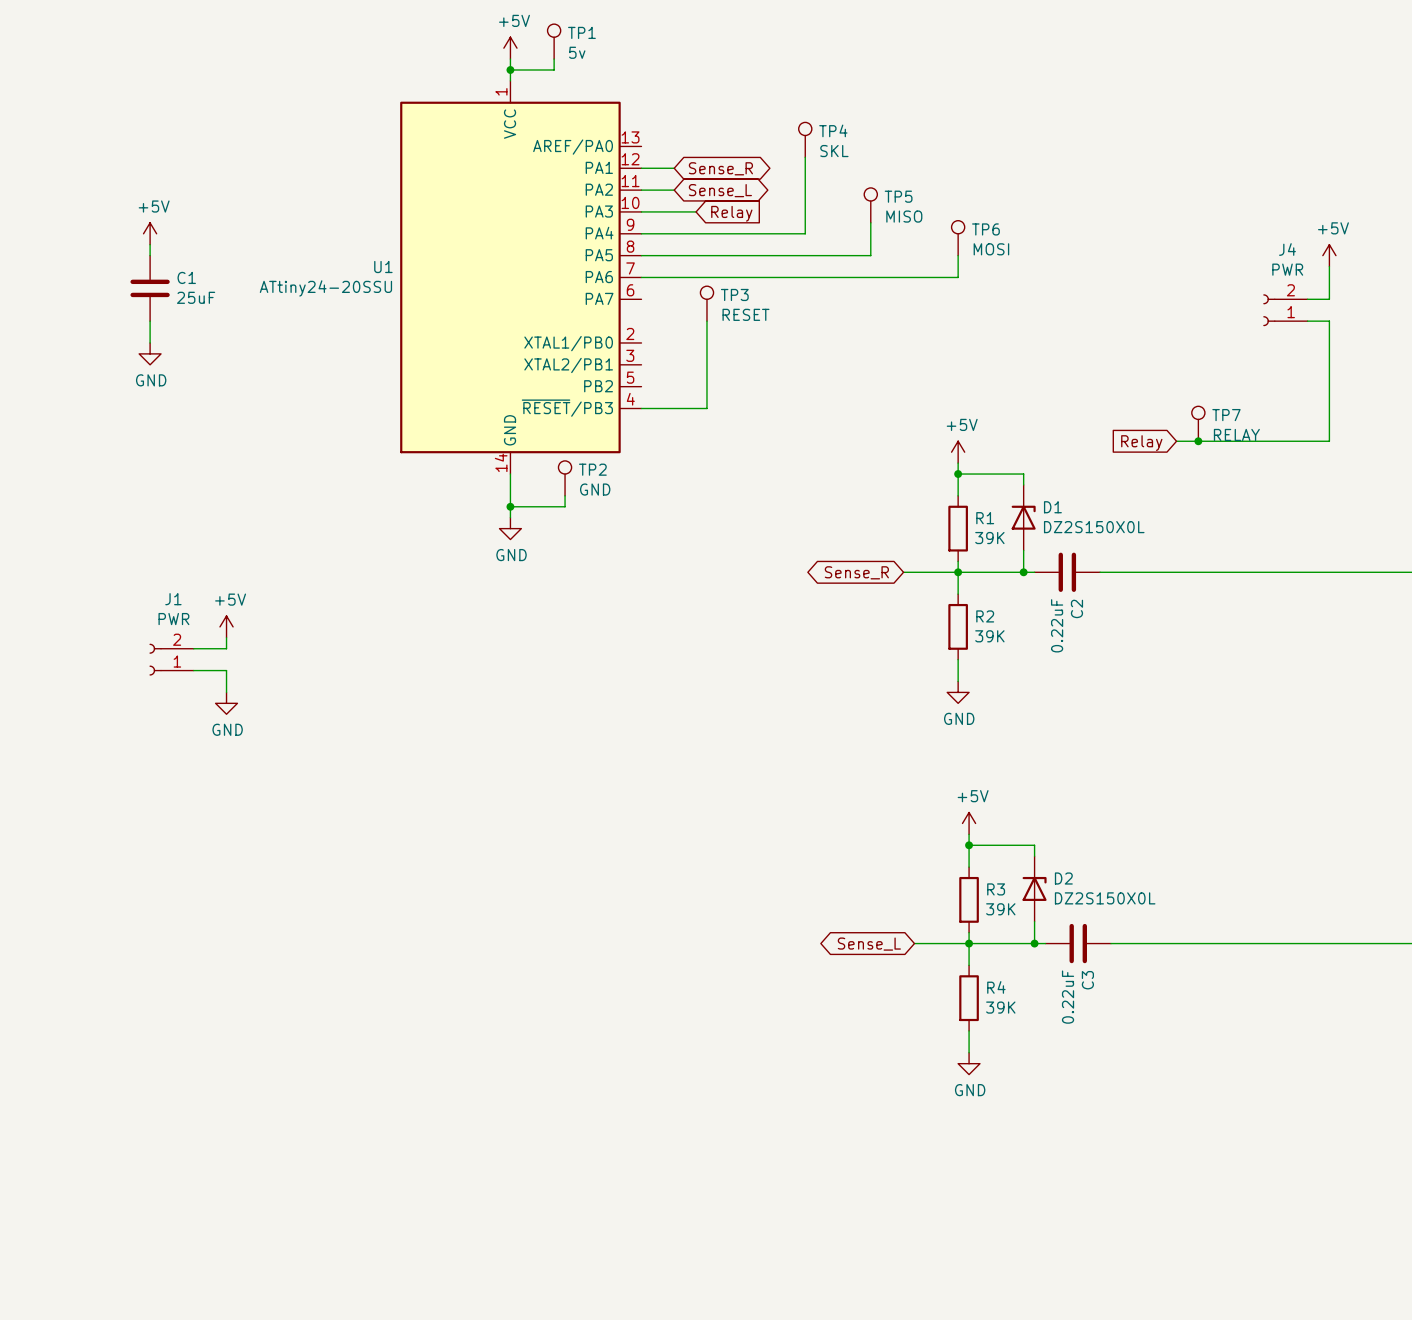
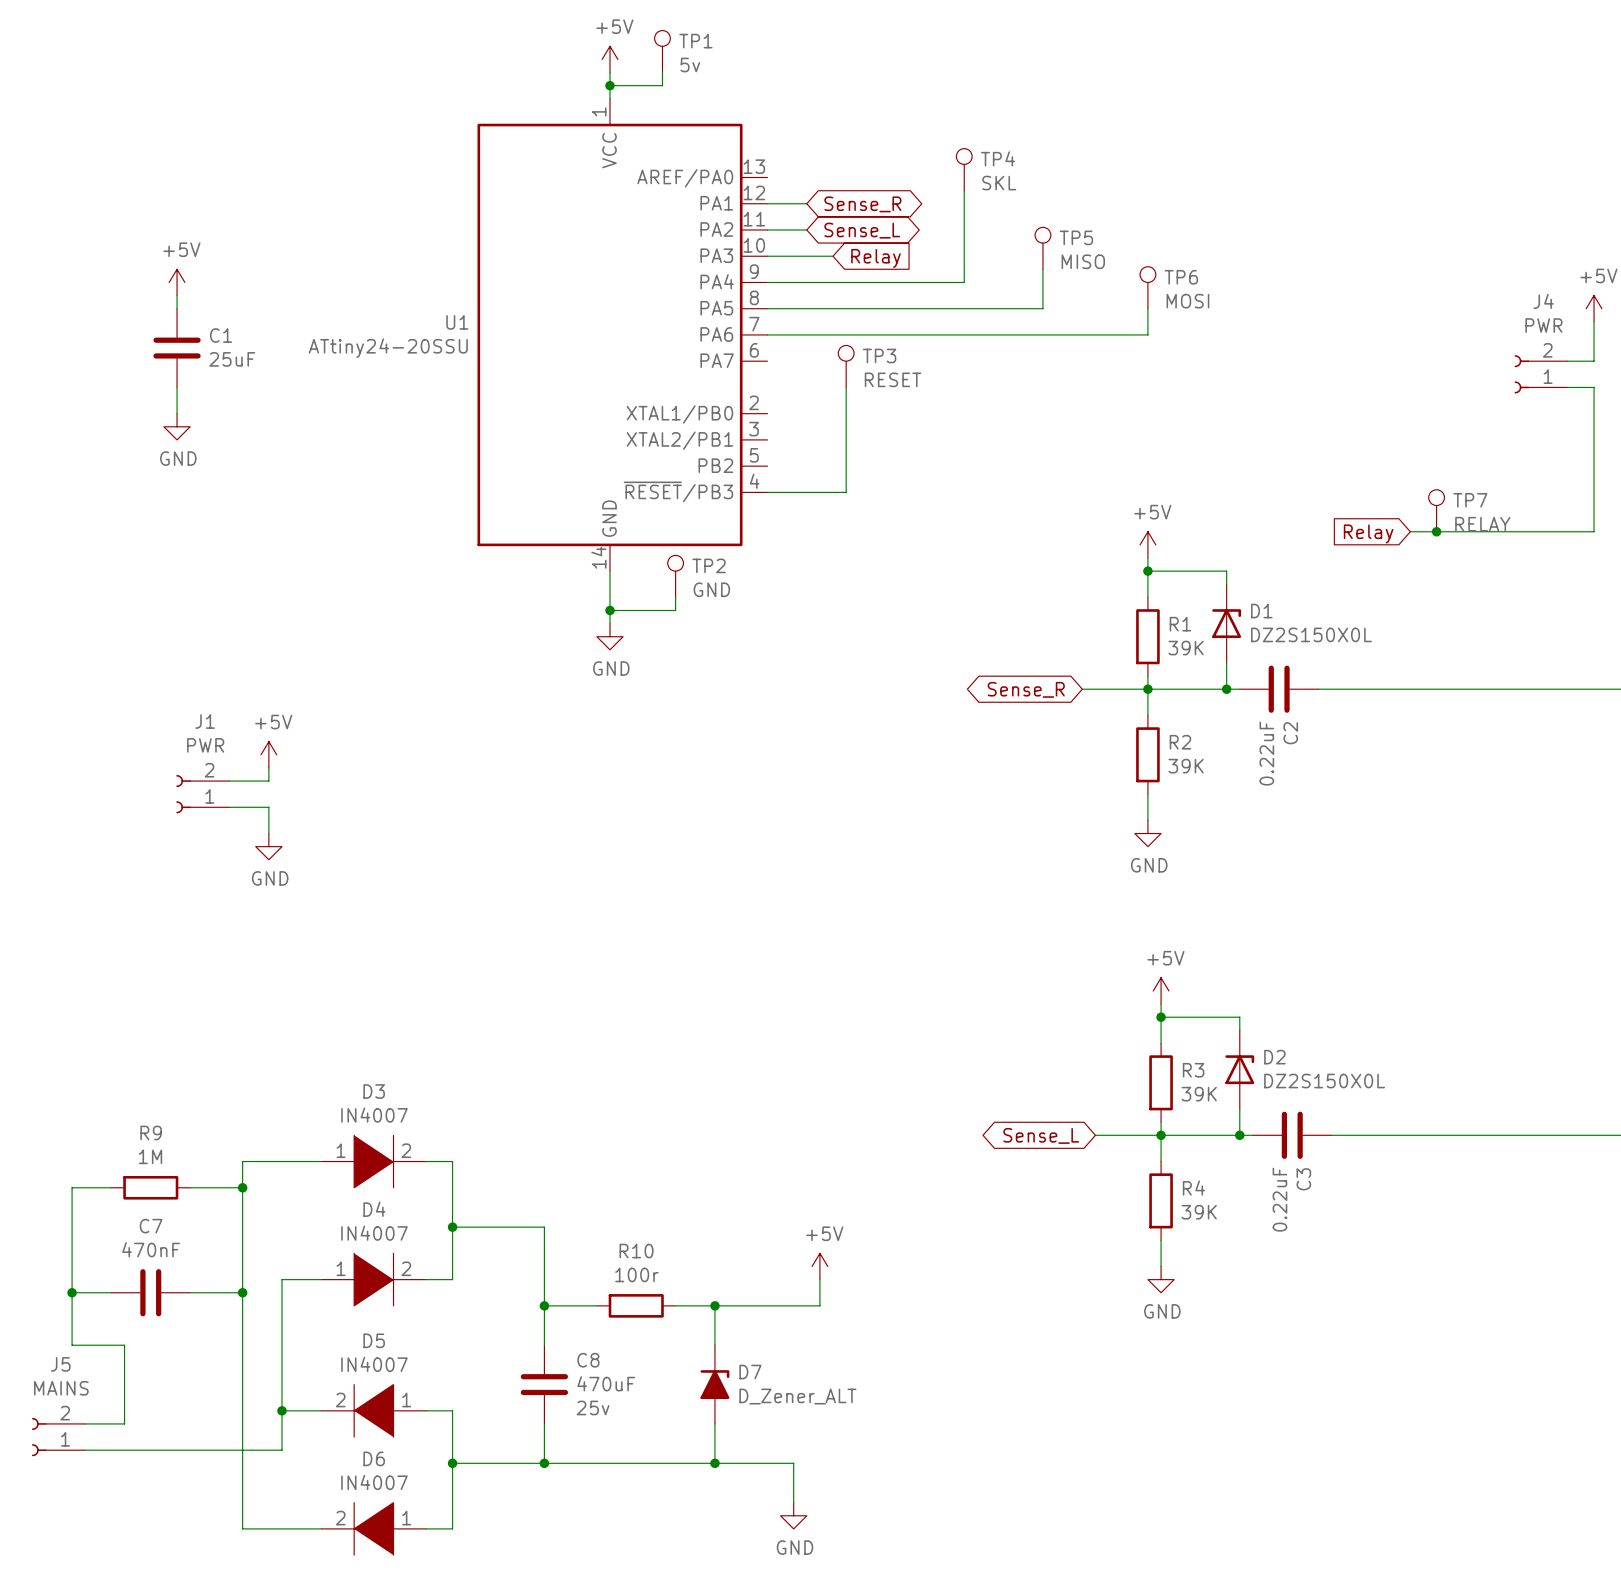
wire: none -> (321, 1161) (242, 1161) (242, 1528) (321, 1528)
D3: none -> IN4007 (373, 1161)
wire: none -> (426, 1161) (452, 1161) (452, 1279) (426, 1279)
wire: none -> (111, 1187) (72, 1187) (72, 1345) (124, 1345) (124, 1423) (85, 1423)
R9: none -> 1M (150, 1187)
wire: none -> (190, 1187) (242, 1187)
junction: none -> (242, 1187)
wire: none -> (452, 1227) (544, 1227) (544, 1345)
junction: none -> (452, 1227)
power symbol: none -> +5V (819, 1266)
wire: none -> (321, 1279) (281, 1279) (281, 1450) (85, 1450)
D4: none -> IN4007 (373, 1279)
wire: none -> (819, 1279) (819, 1305) (675, 1305)
wire: none -> (72, 1292) (111, 1292)
junction: none -> (72, 1292)
C7: none -> 470nF (150, 1292)
wire: none -> (190, 1292) (242, 1292)
junction: none -> (242, 1292)
wire: none -> (544, 1305) (596, 1305)
junction: none -> (544, 1305)
R10: none -> 100r (636, 1305)
wire: none -> (714, 1305) (714, 1345)
junction: none -> (714, 1305)
C8: none -> 470uF (544, 1384)
D7: none -> D_Zener_ALT (714, 1384)
wire: none -> (281, 1410) (321, 1410)
junction: none -> (281, 1410)
D5: none -> IN4007 (373, 1410)
wire: none -> (426, 1410) (452, 1410) (452, 1528) (426, 1528)
wire: none -> (544, 1423) (544, 1463)
wire: none -> (714, 1423) (714, 1463)
J5: none -> MAINS (58, 1437)
wire: none -> (452, 1463) (793, 1463) (793, 1502)
junction: none -> (452, 1463)
junction: none -> (544, 1463)
junction: none -> (714, 1463)
power symbol: none -> GND (793, 1515)
D6: none -> IN4007 (373, 1528)

